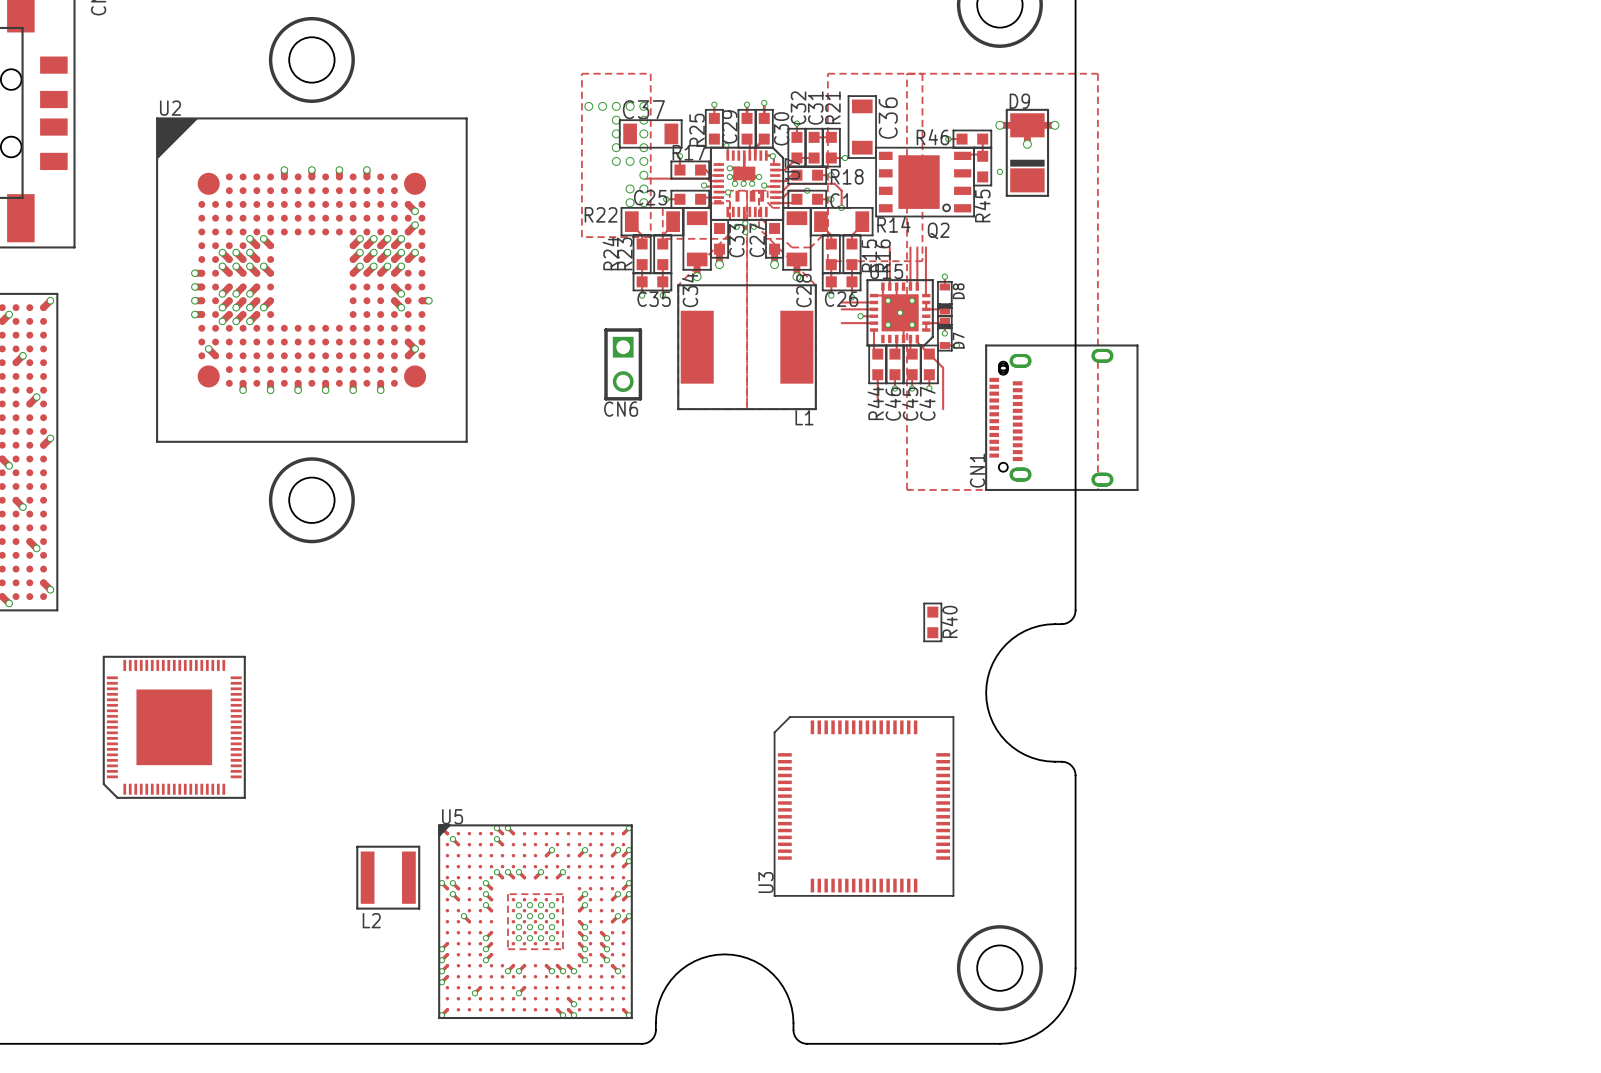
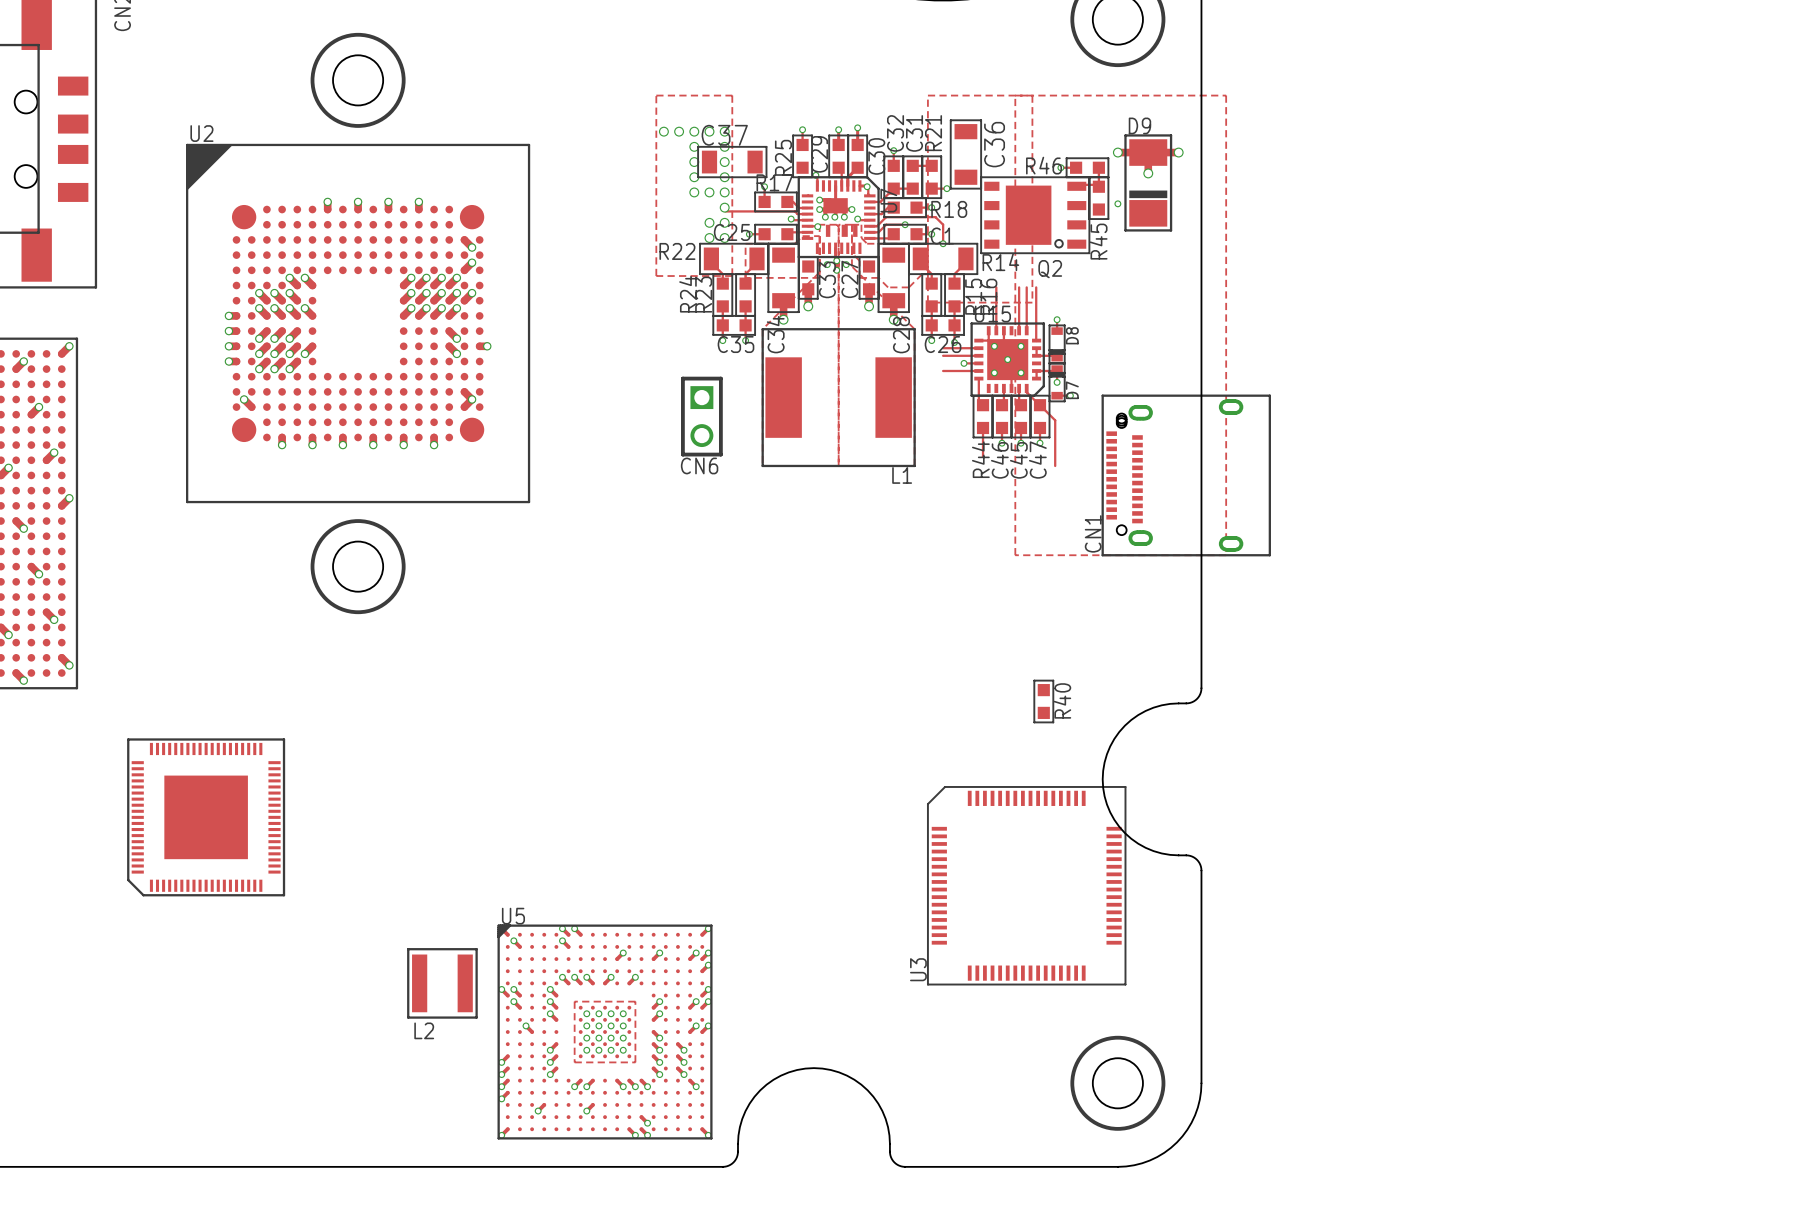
U3 position: (864, 806) -> (1026, 885)

